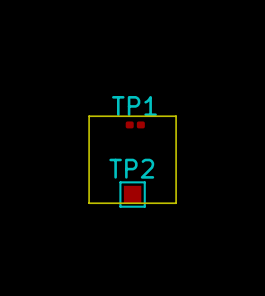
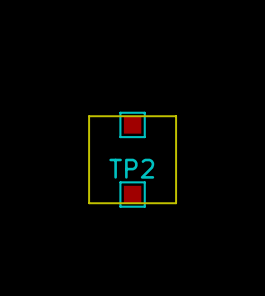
part: none -> (132, 124)
TP1: (135, 124) -> none

